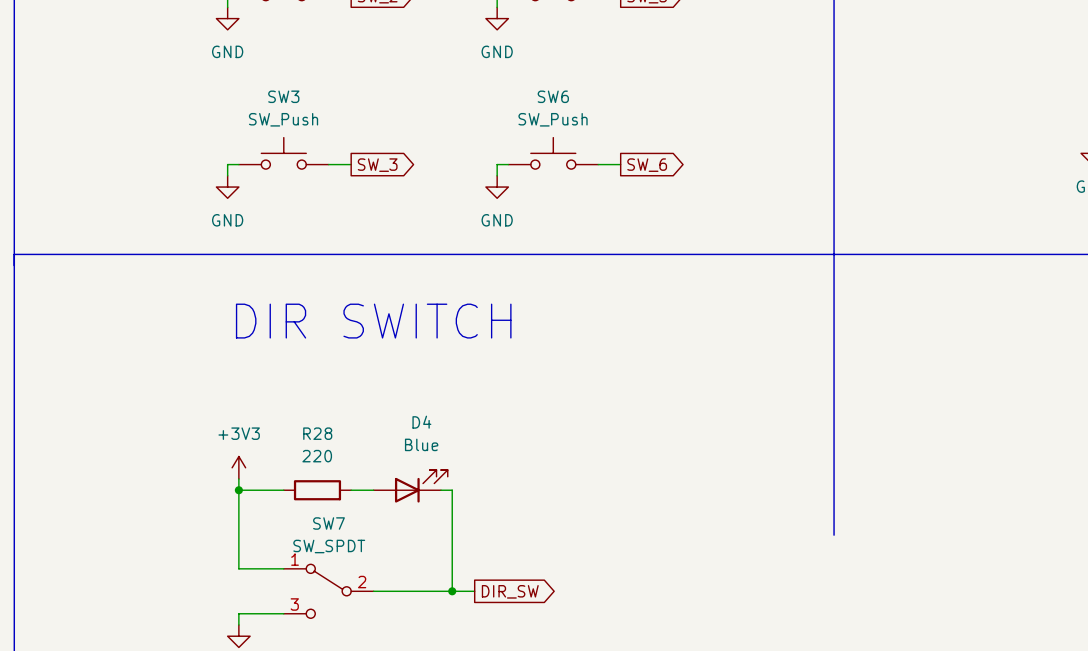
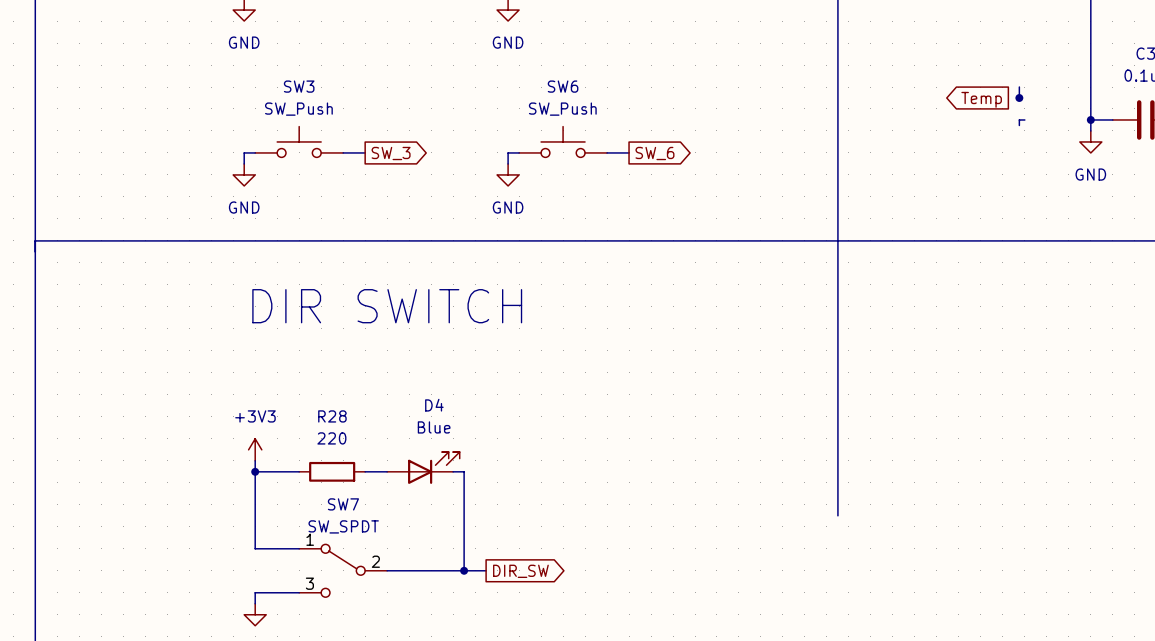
wire: none -> (1019, 87) (1019, 98)
junction: none -> (1019, 98)
global label: none -> Temp (981, 99)
wire: none -> (1024, 119) (1019, 119) (1019, 125)

